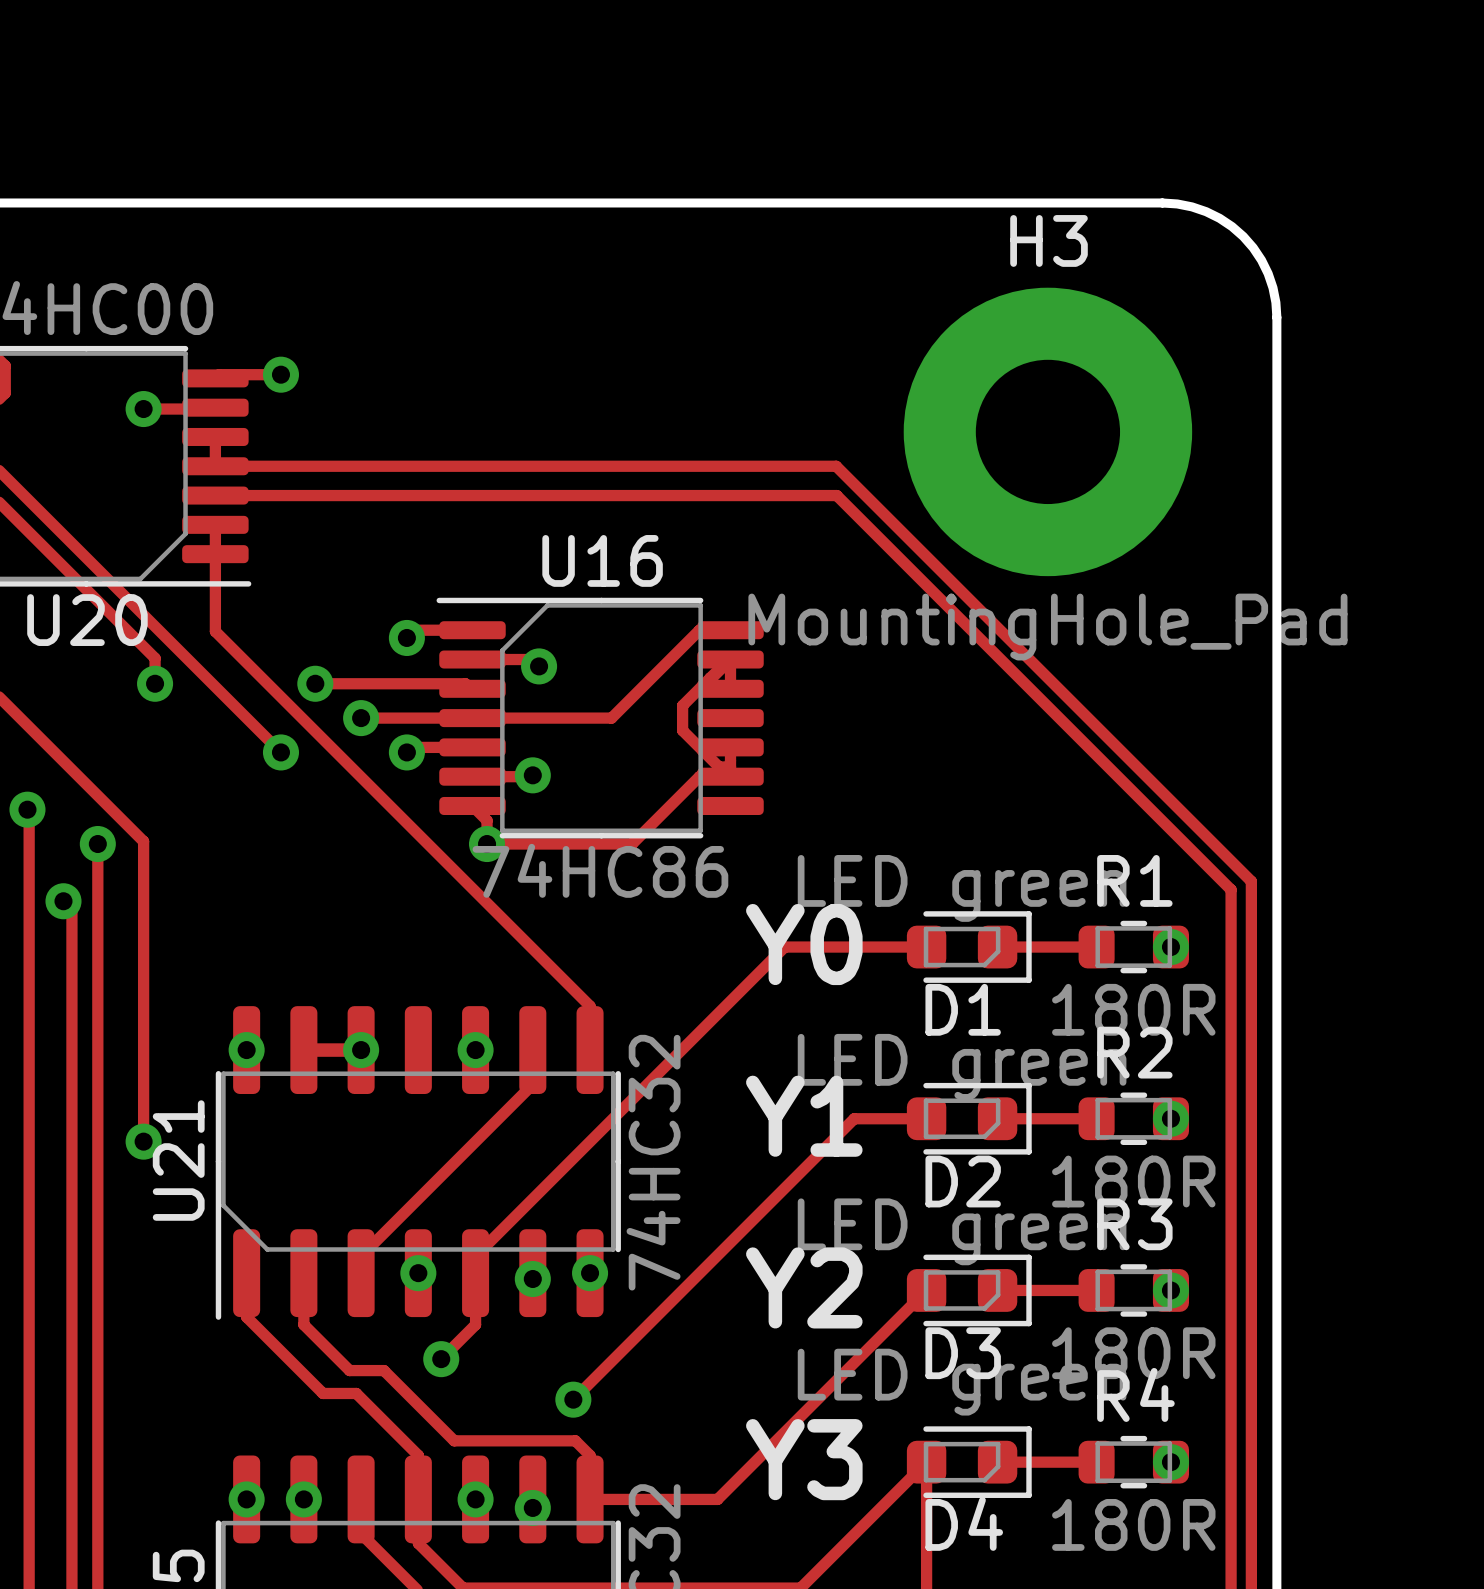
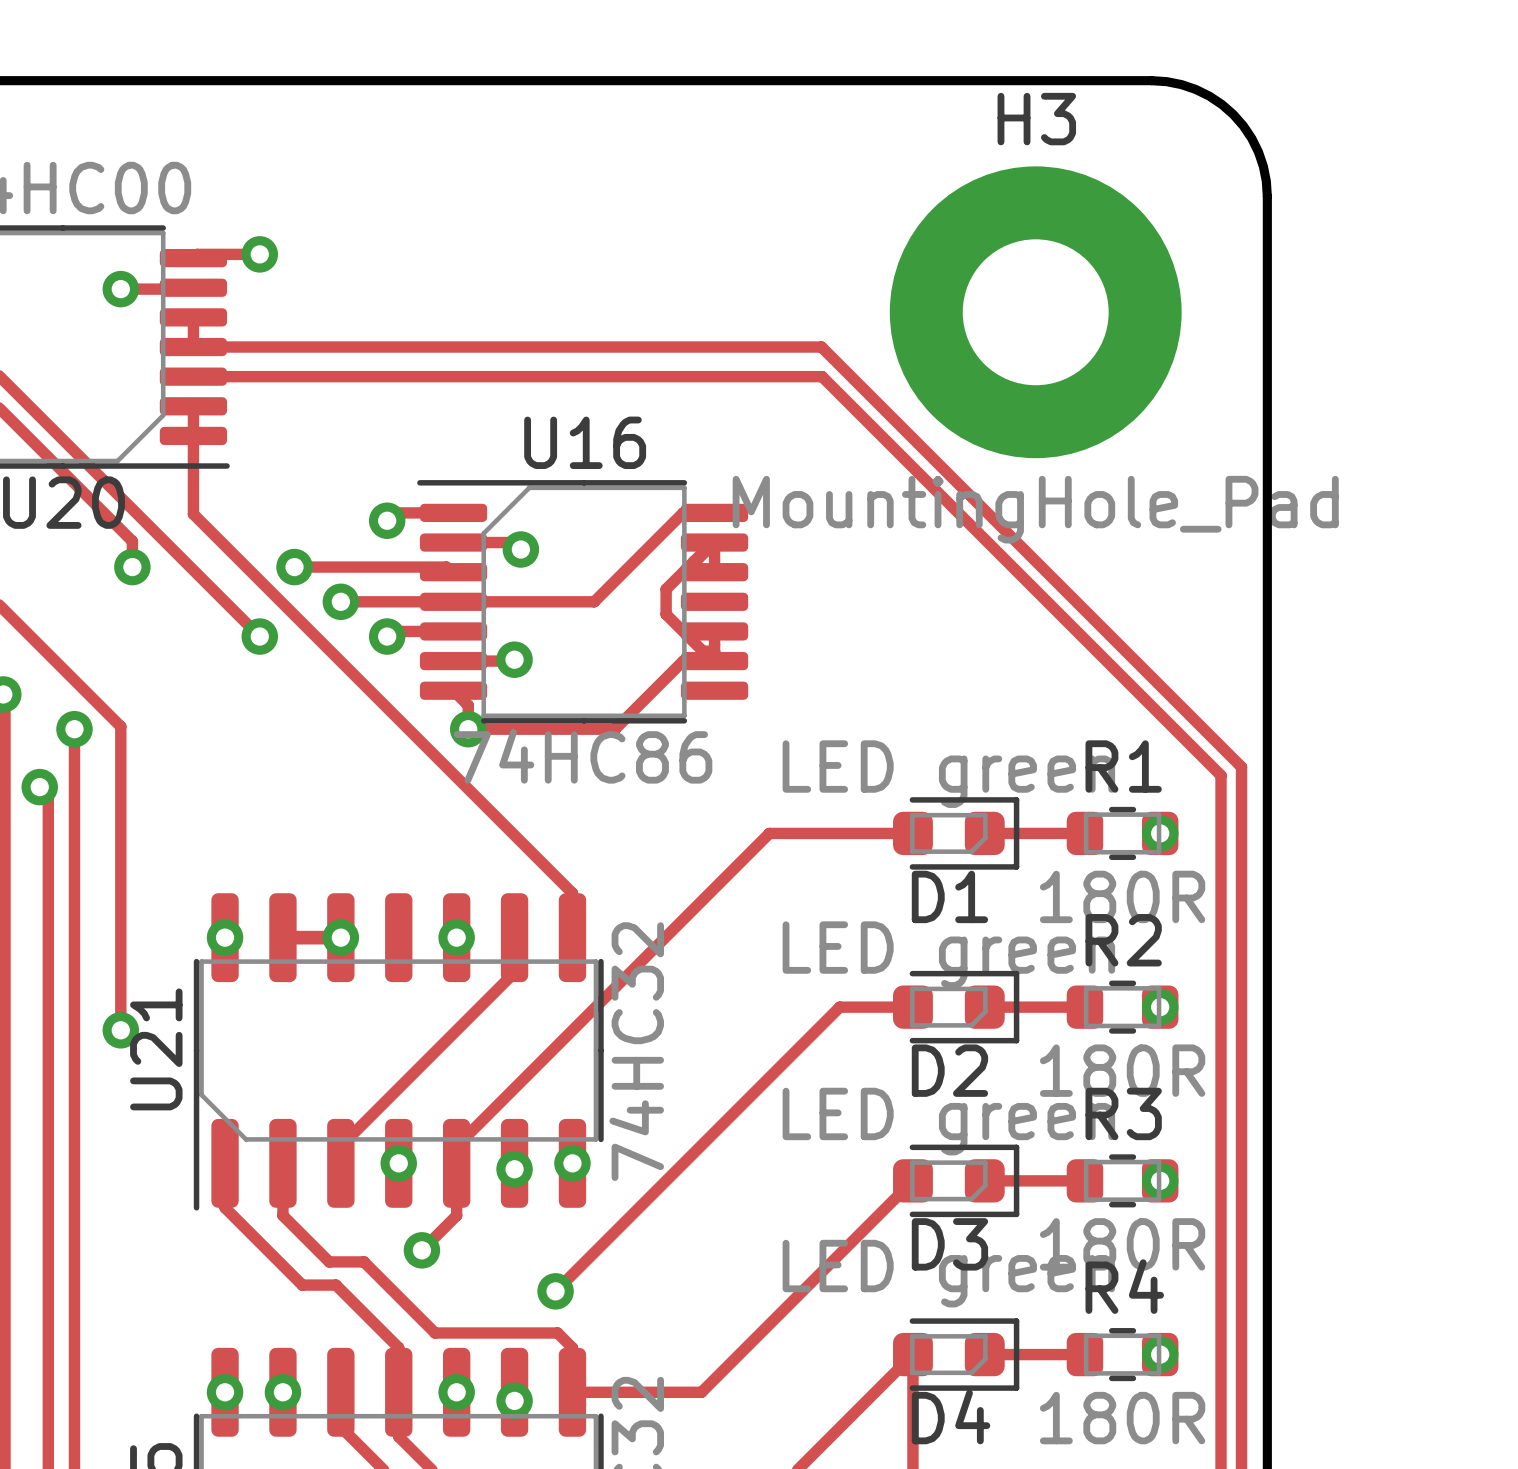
text: Y0 (804, 944) -> none
text: Y1 (804, 1116) -> none
text: Y2 (804, 1287) -> none
text: Y3 (804, 1459) -> none

